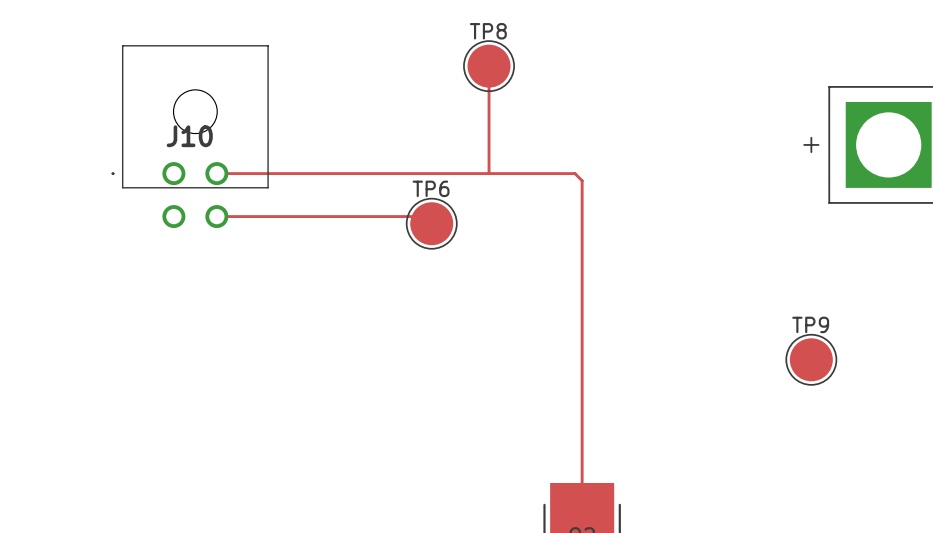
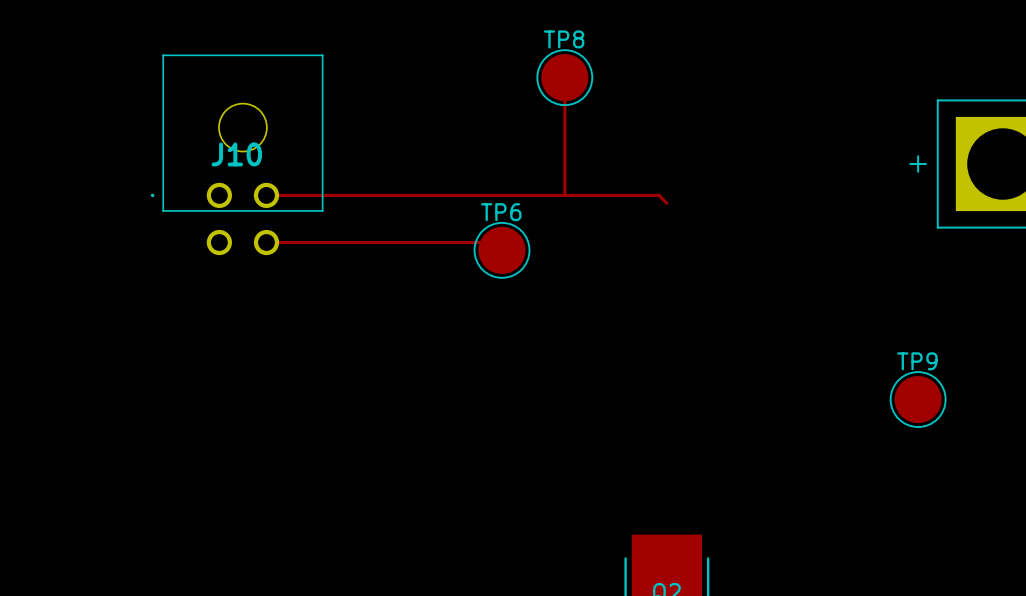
top track: (582, 180) (582, 517) -> none

